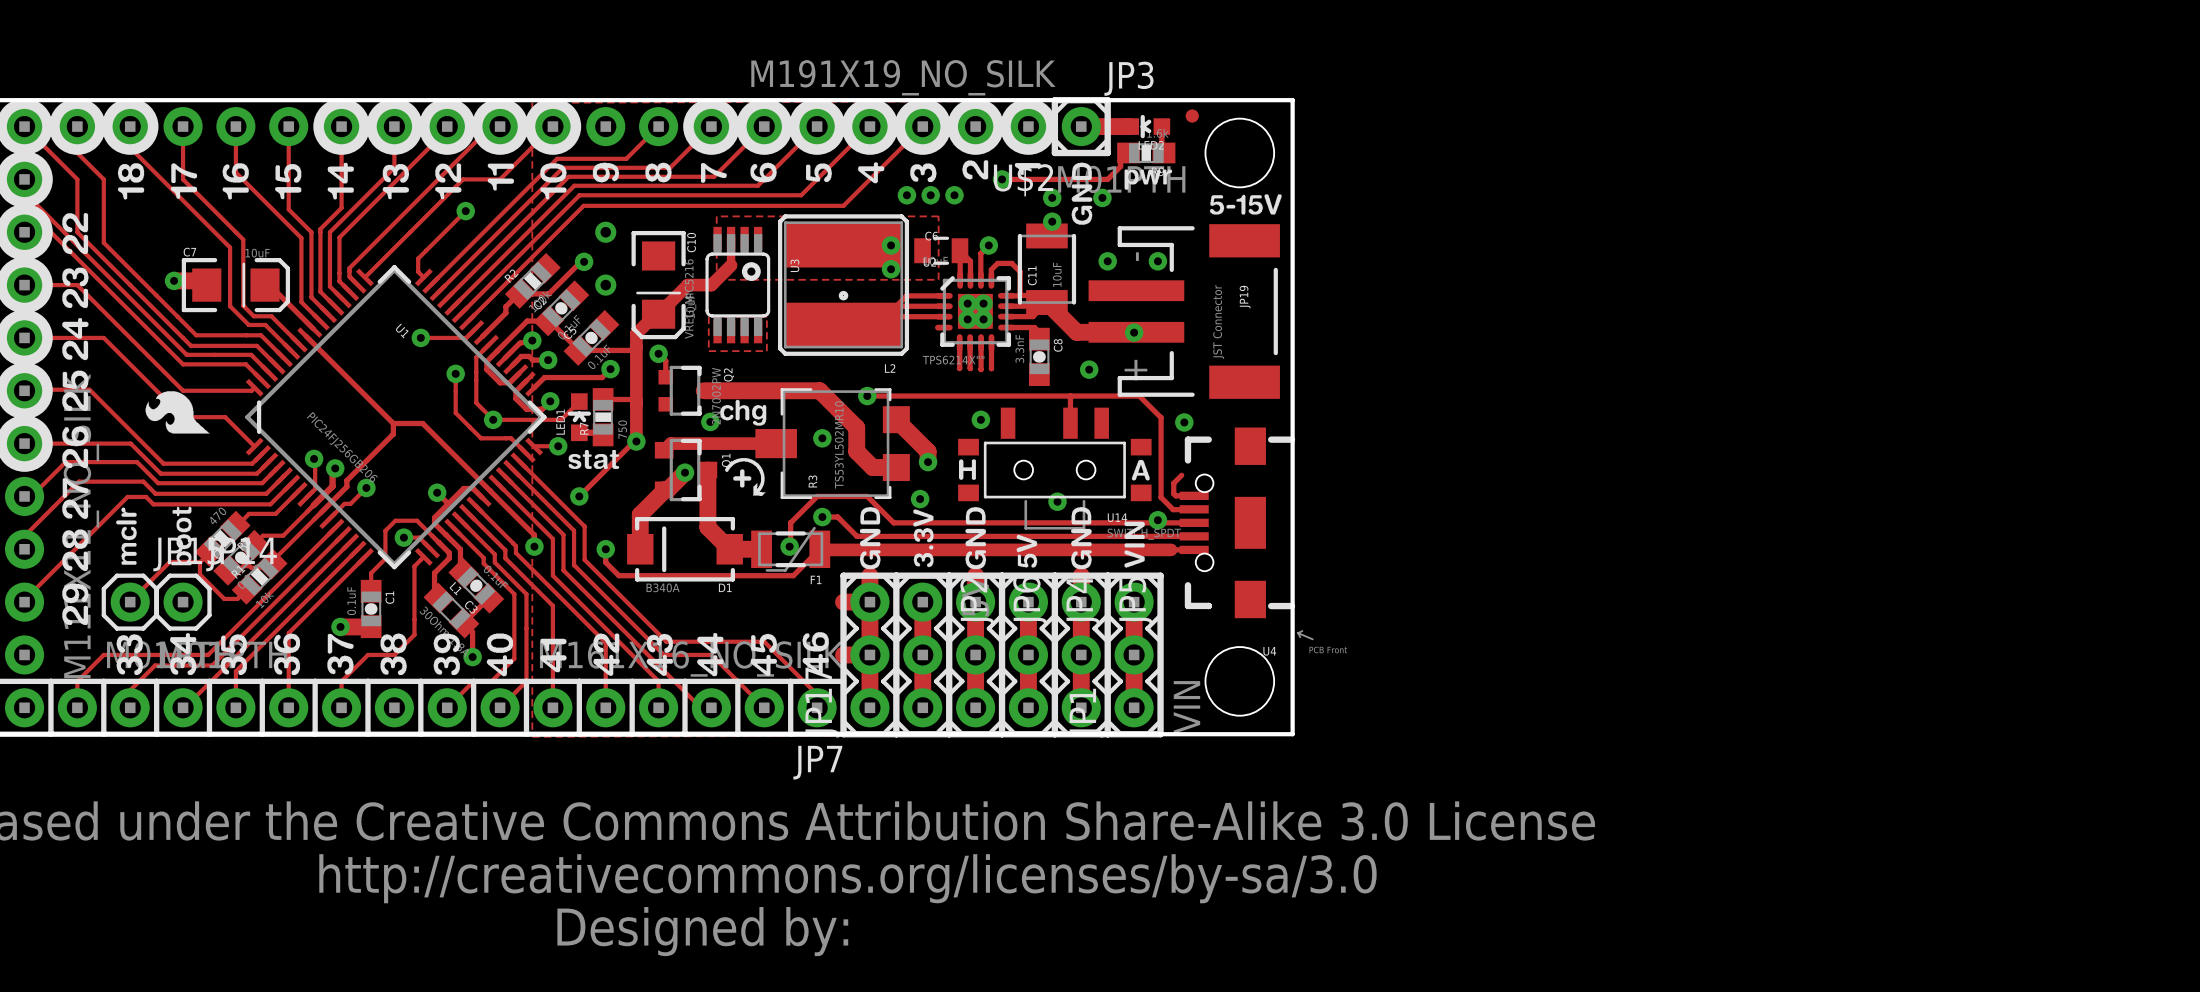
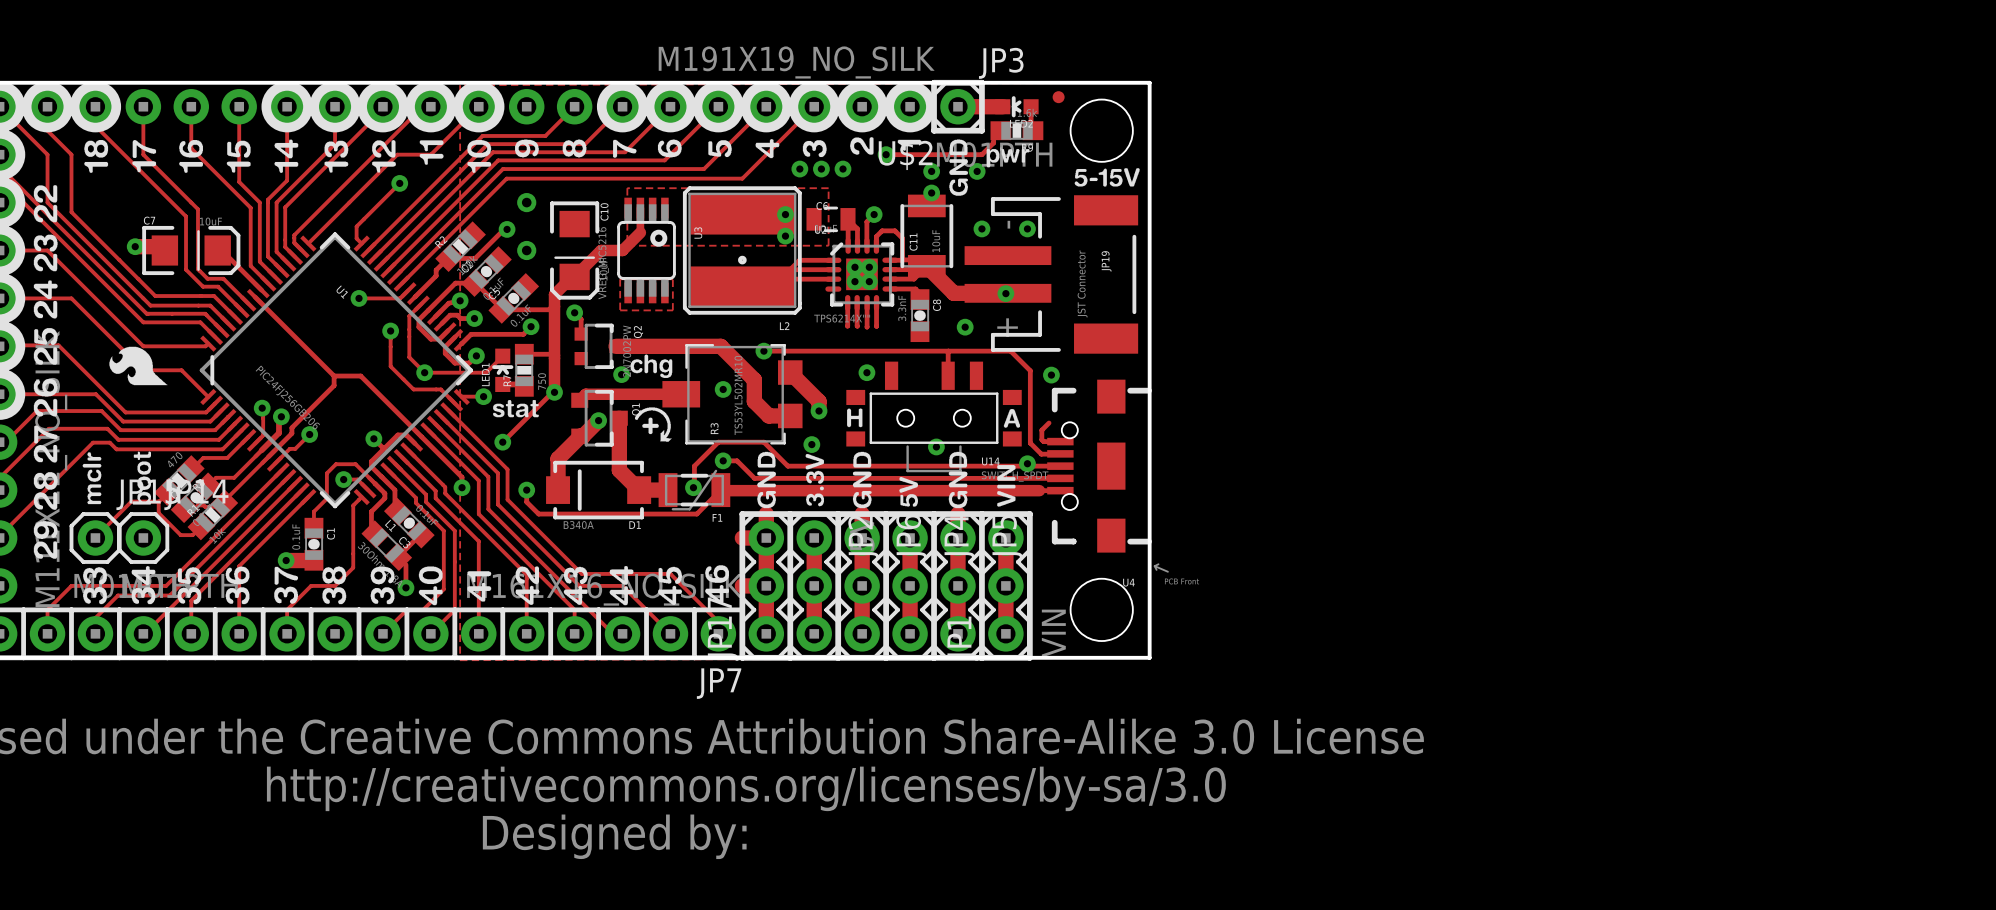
drawing: [1124, 169, 1173, 190] -> none
drawing: none -> [986, 149, 1030, 168]

